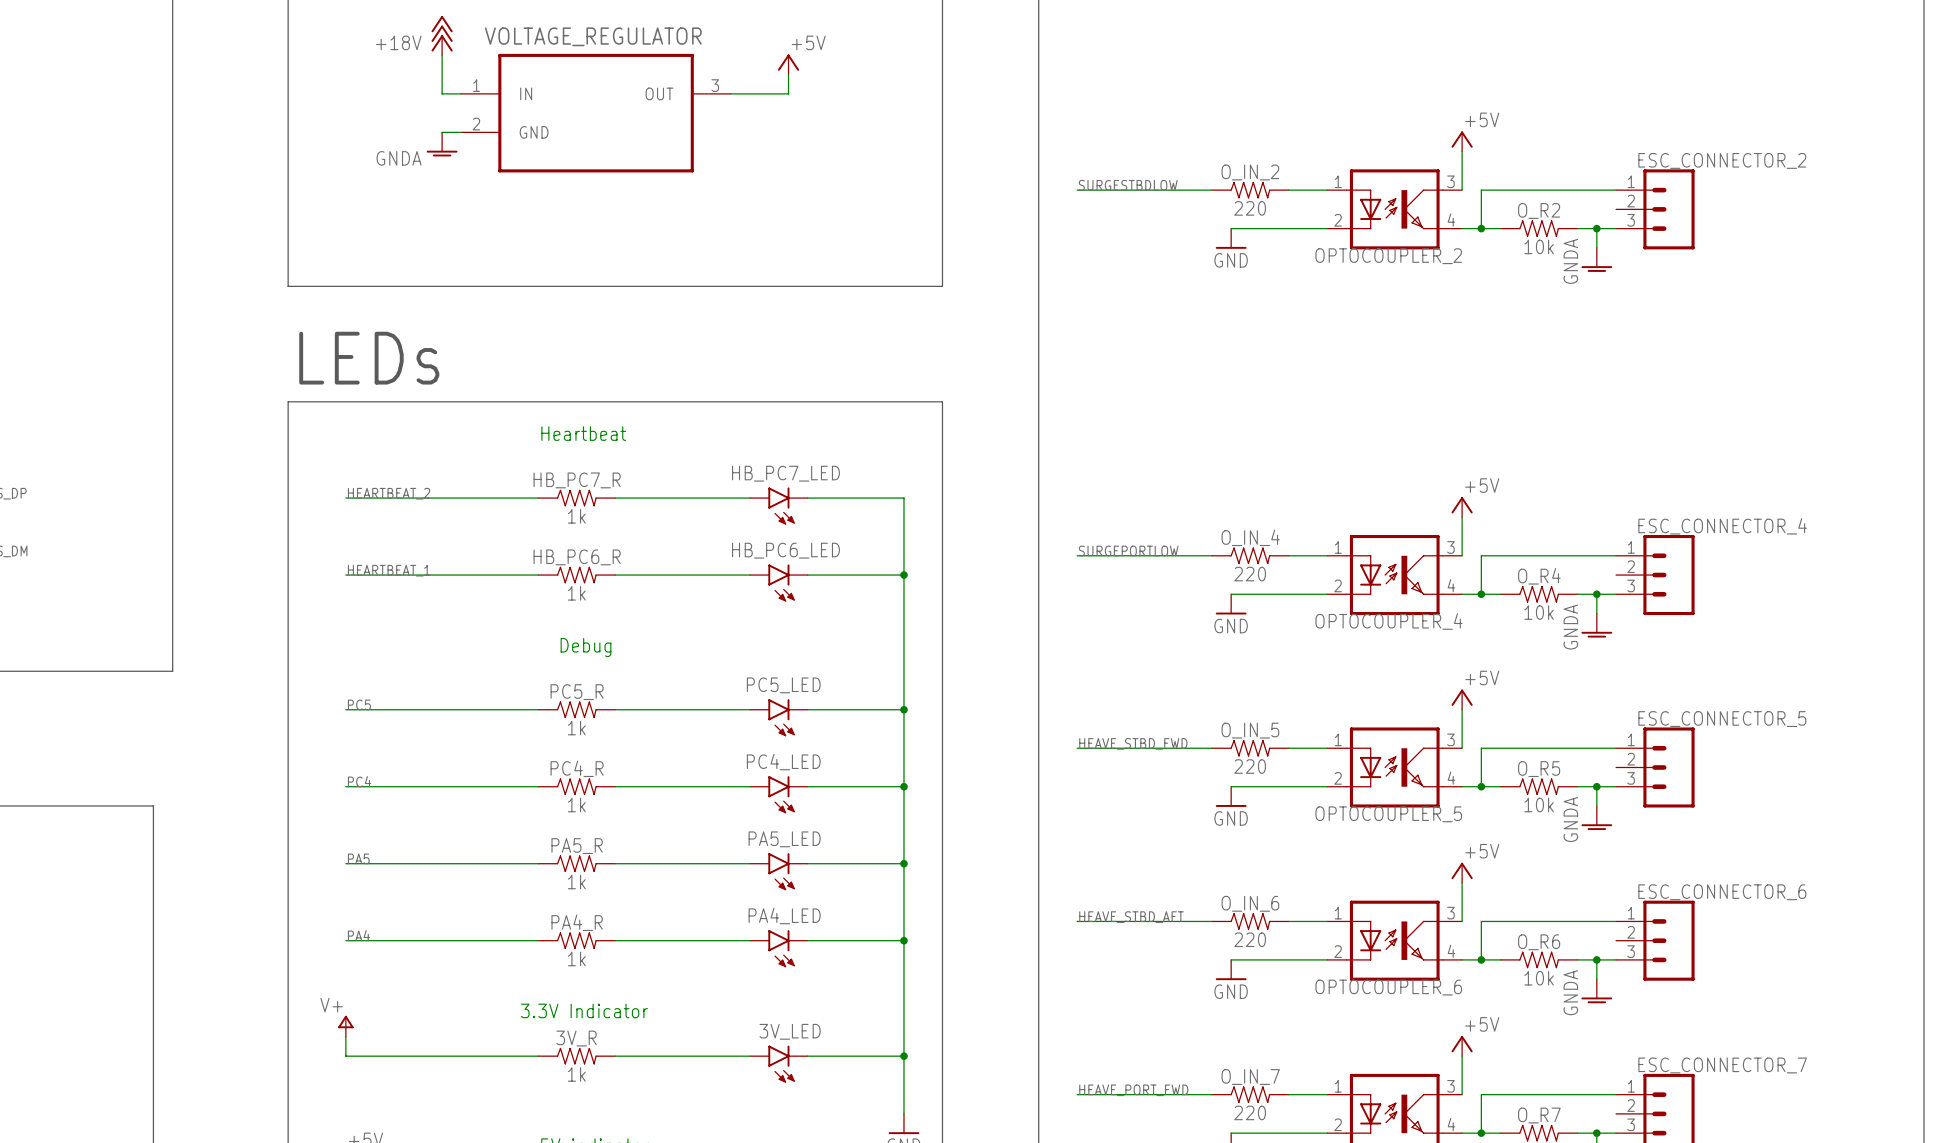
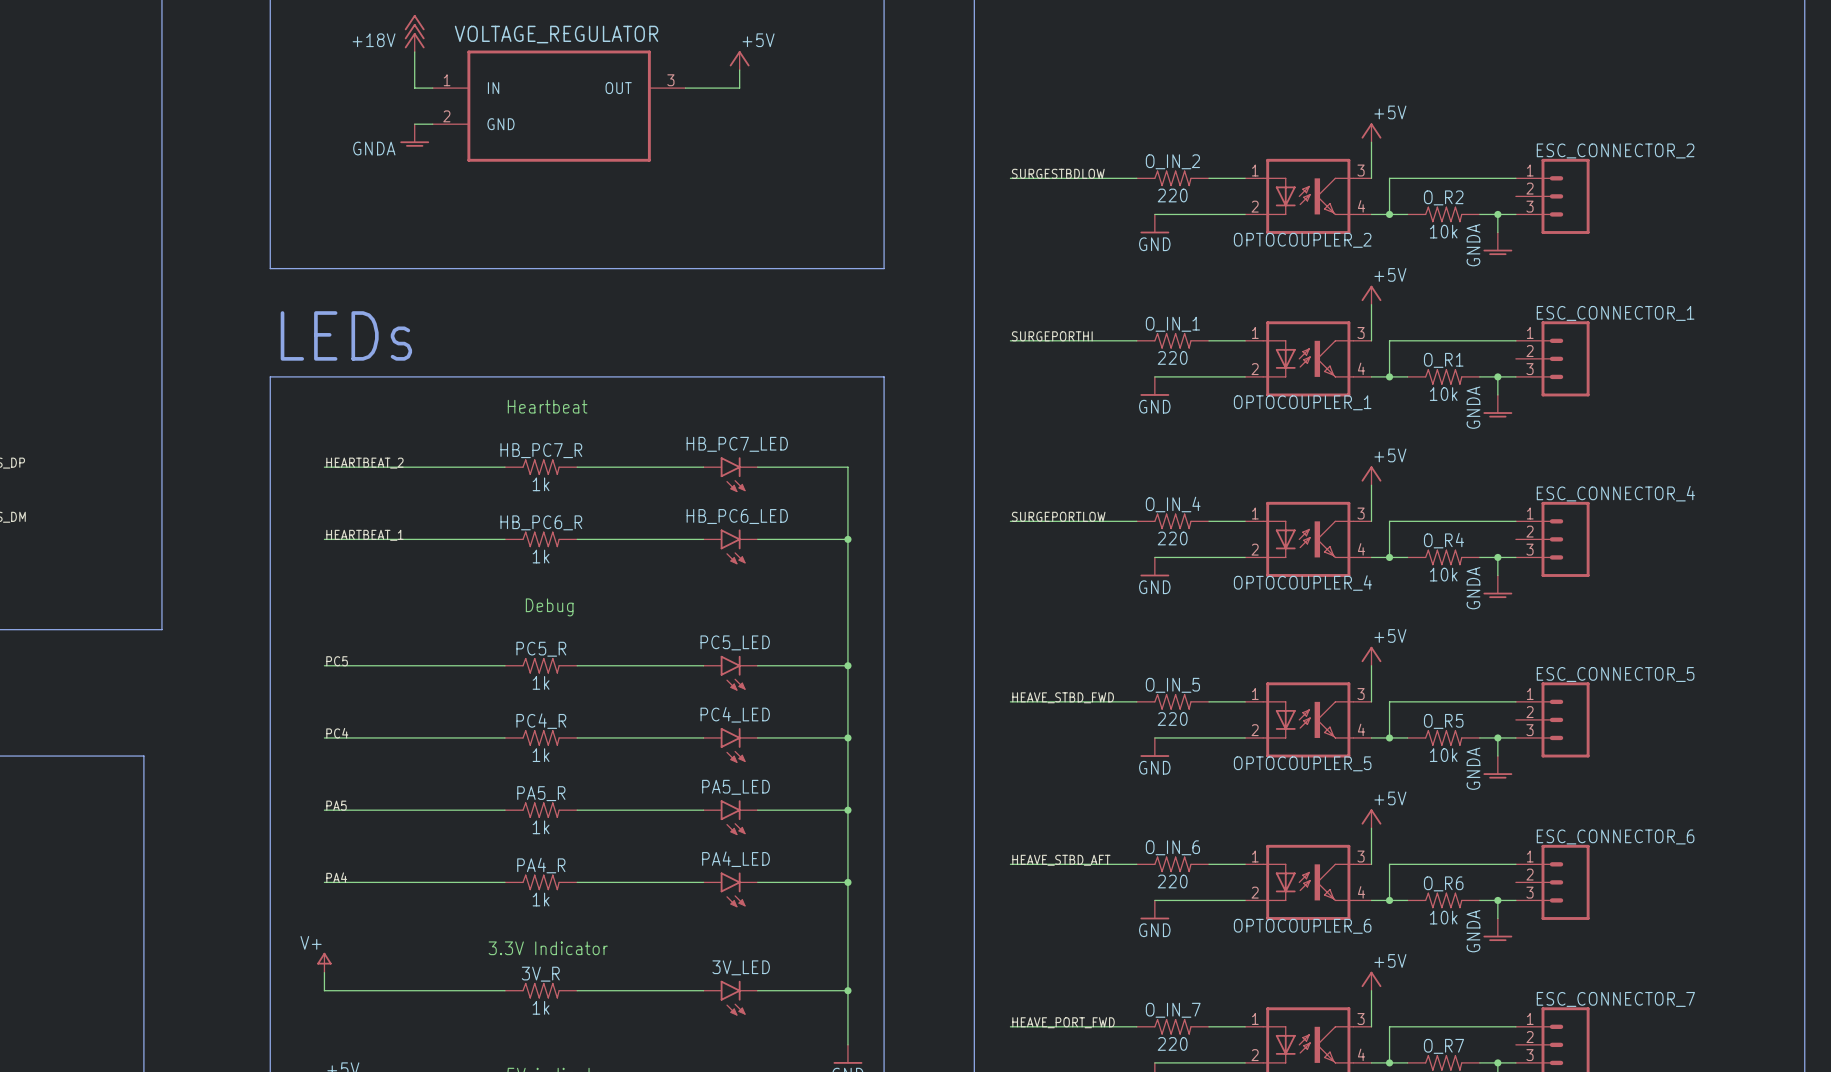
power symbol: none -> +5V (1371, 295)
wire: none -> (1371, 304) (1371, 340)
label: none -> SURGEPORTHI (1052, 336)
wire: none -> (1010, 340) (1136, 340)
O_IN_1: none -> 220 (1172, 340)
wire: none -> (1209, 340) (1245, 340)
wire: none -> (1515, 340) (1389, 340) (1389, 376)
OPTOCOUPLER_1: none -> (1308, 358)
ESC_CONNECTOR_1: none -> (1552, 358)
wire: none -> (1154, 376) (1245, 376)
wire: none -> (1371, 376) (1407, 376)
junction: none -> (1389, 376)
O_R1: none -> 10k (1443, 376)
wire: none -> (1479, 376) (1515, 376)
wire: none -> (1497, 376) (1497, 394)
junction: none -> (1497, 376)
power symbol: none -> GND (1154, 386)
power symbol: none -> GNDA (1497, 406)

